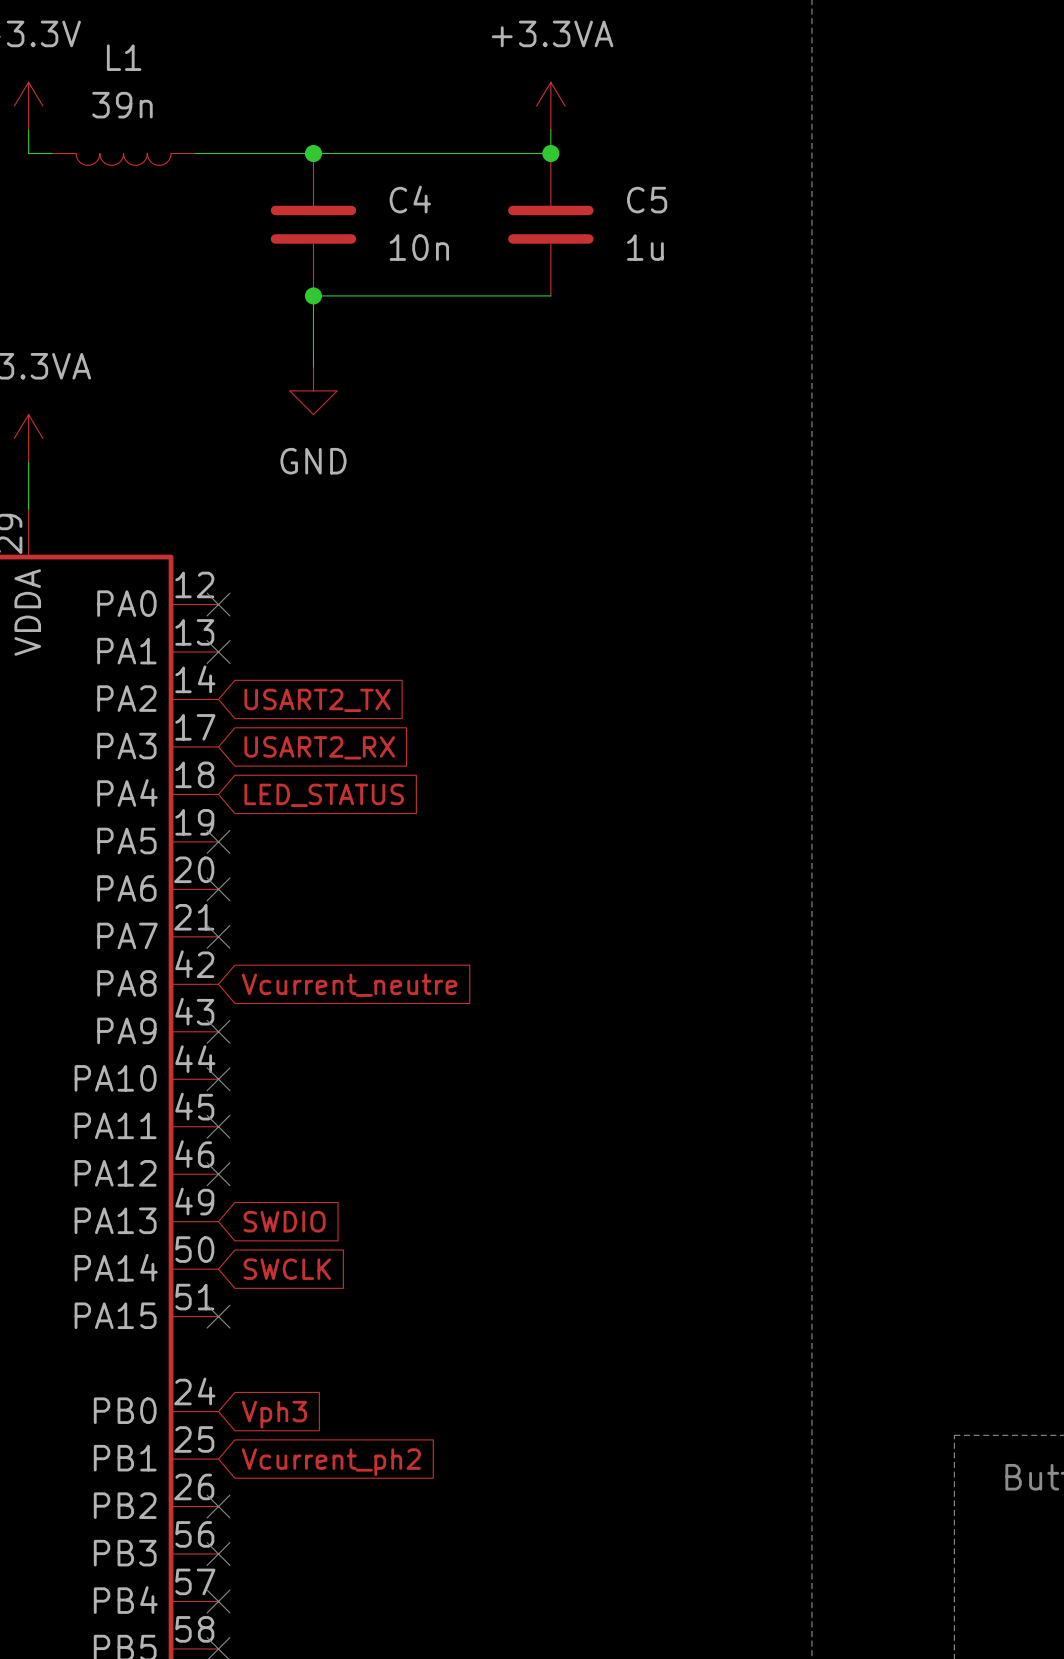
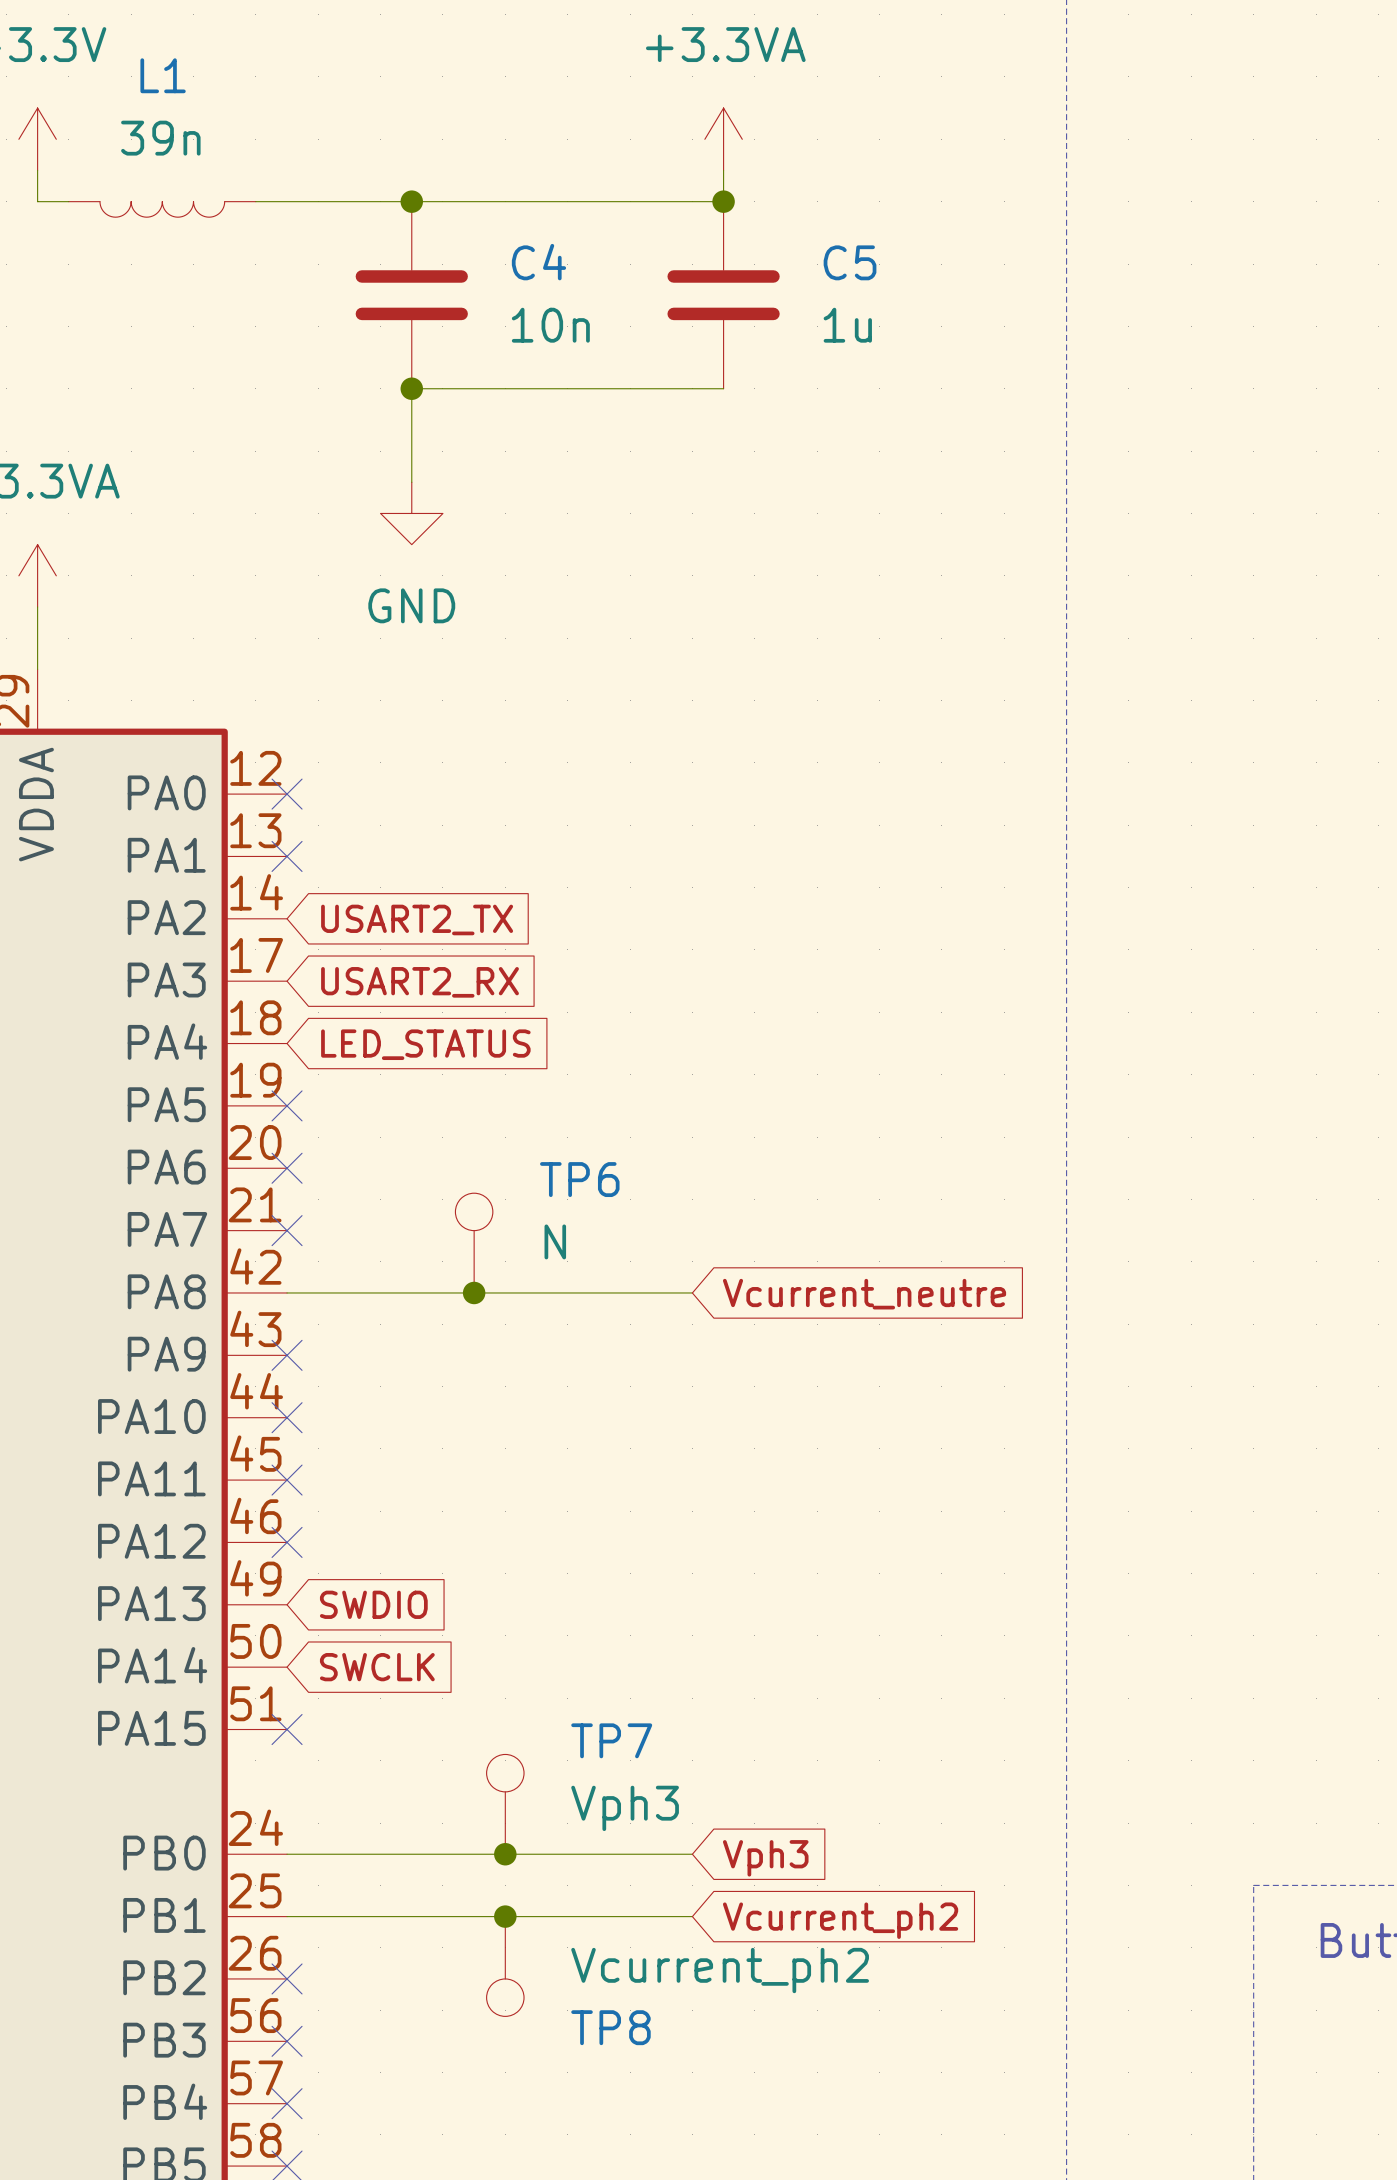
TP6: none -> N (474, 1243)
wire: none -> (287, 1292) (692, 1292)
junction: none -> (474, 1292)
global label position: Vcurrent_neutre (349, 985) -> Vcurrent_neutre (864, 1294)
TP7: none -> Vph3 (505, 1804)
wire: none -> (287, 1854) (692, 1854)
junction: none -> (505, 1854)
global label position: Vph3 (274, 1414) -> Vph3 (765, 1858)
wire: none -> (287, 1916) (692, 1916)
junction: none -> (505, 1916)
global label position: Vcurrent_ph2 (331, 1462) -> Vcurrent_ph2 (840, 1920)
TP8: none -> Vcurrent_ph2 (505, 1966)

